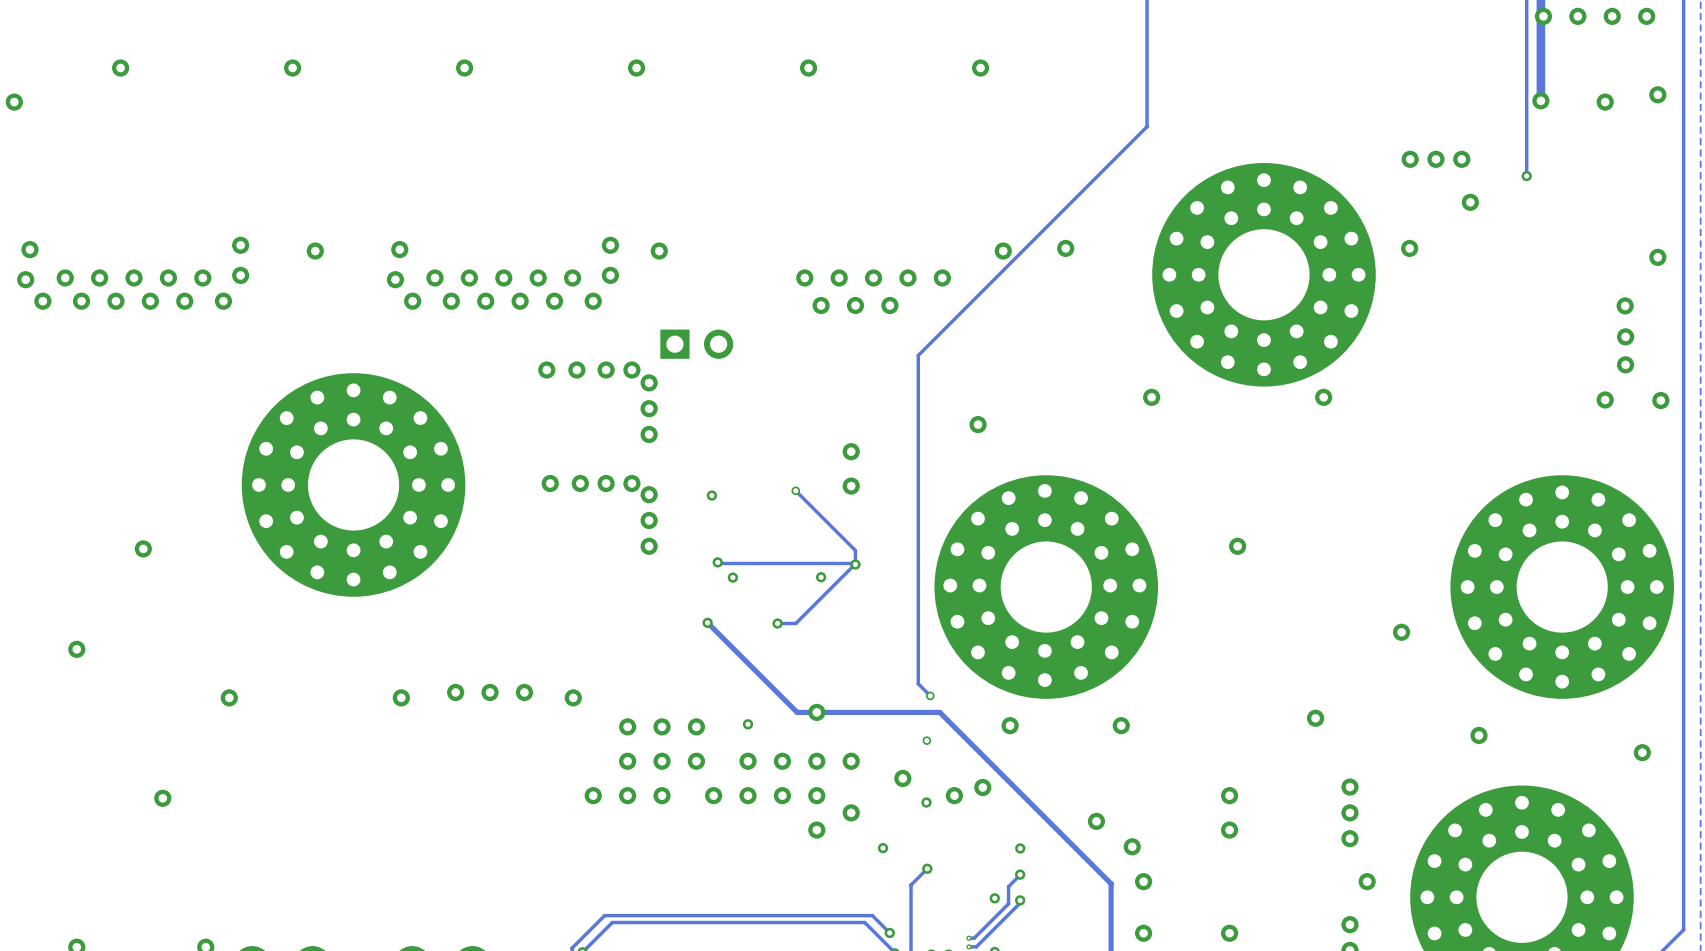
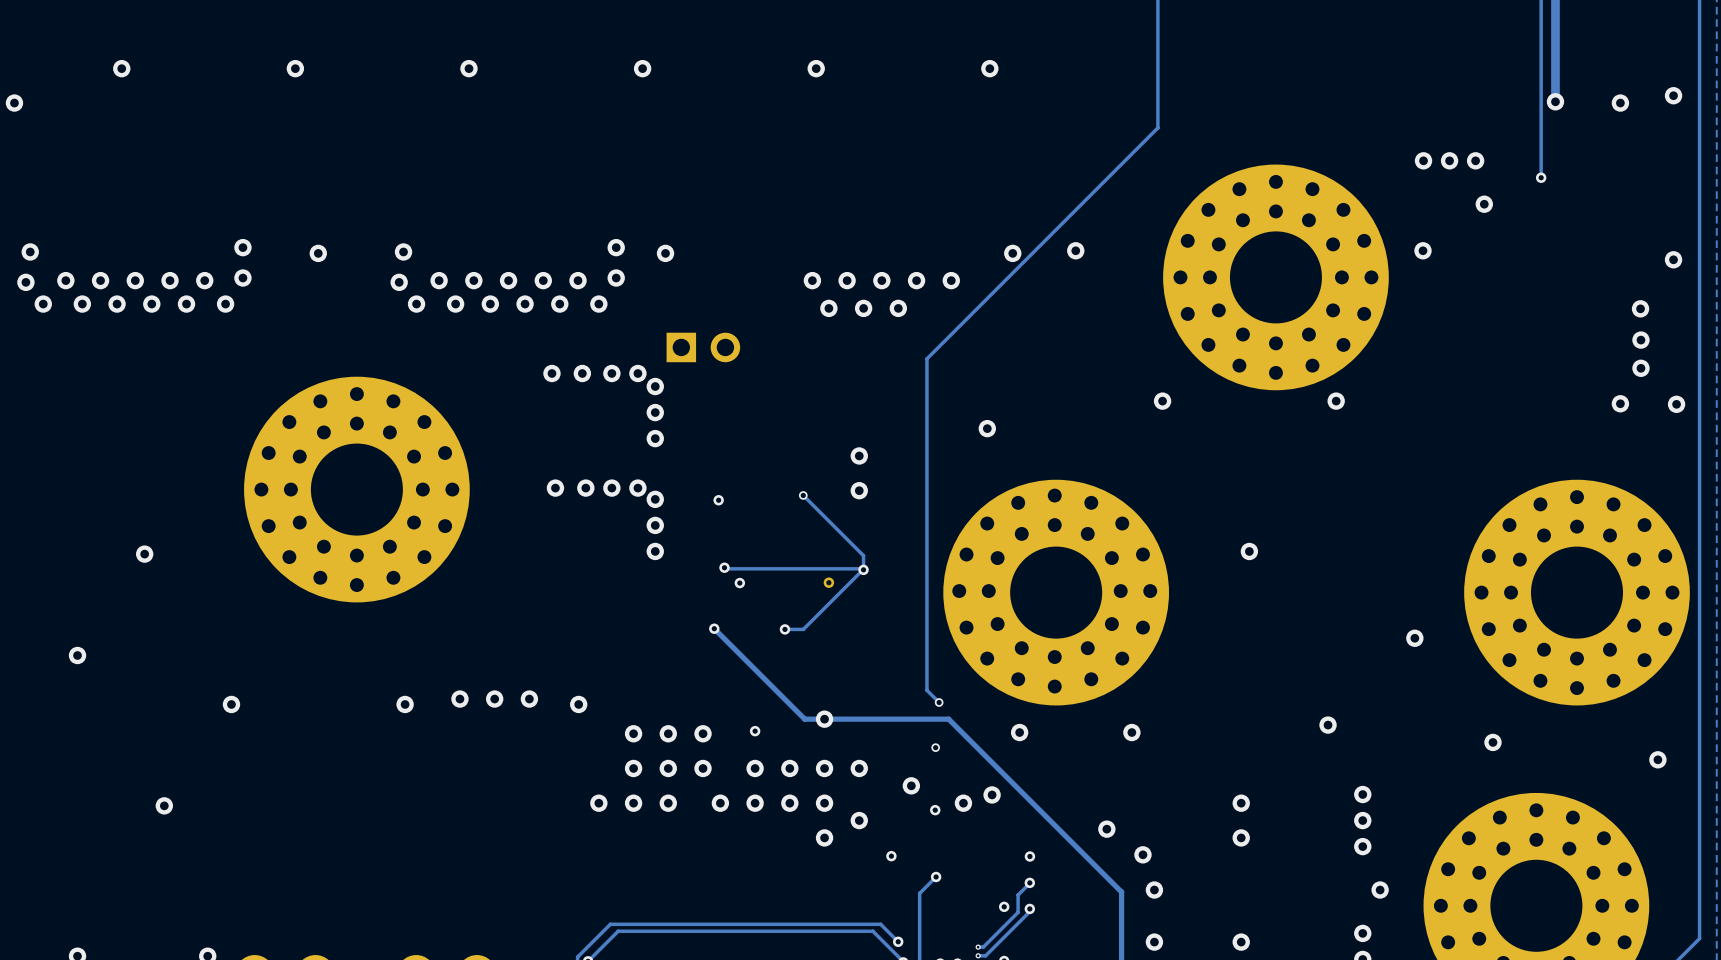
via: (1543, 16) -> none
via: (1577, 16) -> none
via: (1612, 16) -> none
via: (1646, 16) -> none

